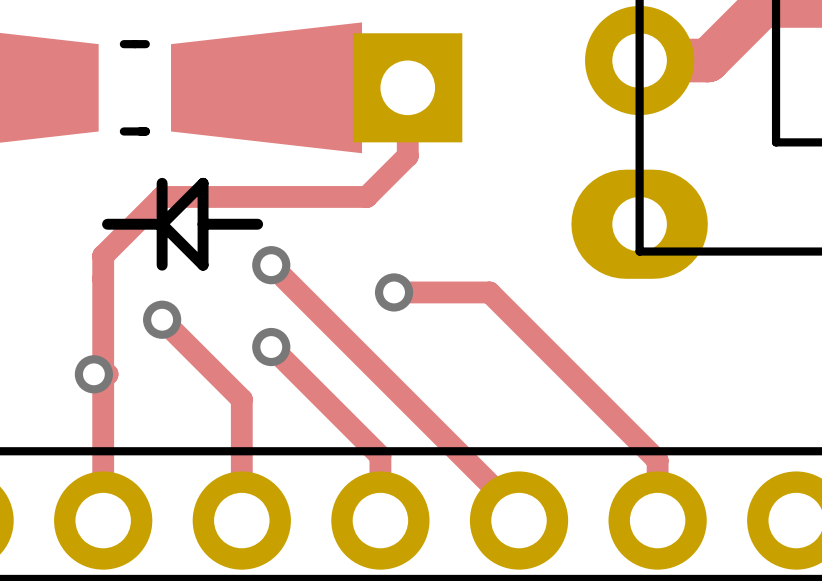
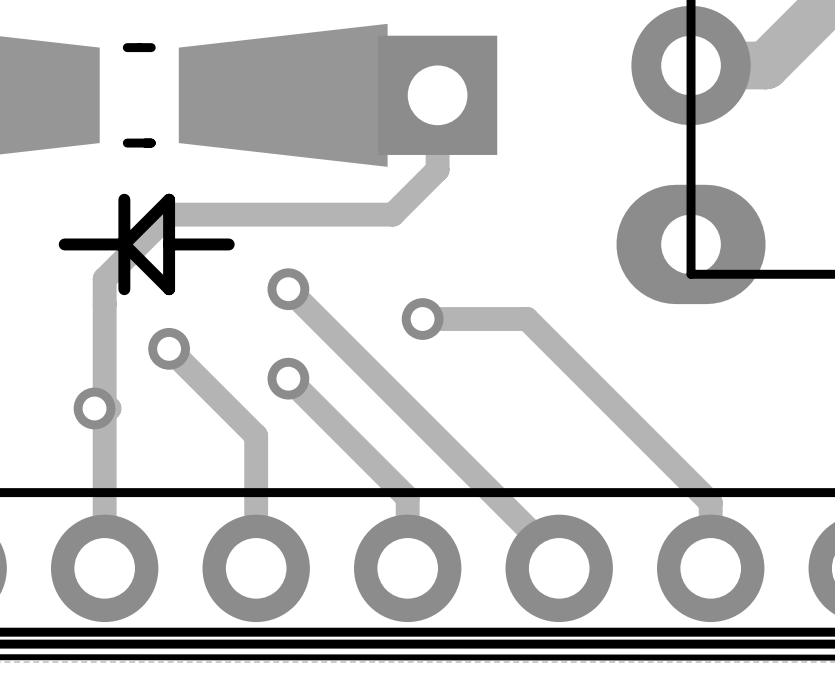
line: none -> (124, 199) (124, 289)
line: none -> (169, 199) (124, 244) (169, 289)
line: (121, 224) (162, 224) -> (64, 244) (109, 244)
line: (162, 224) (203, 183) (203, 265) (162, 224) -> (169, 244) (213, 244)
line: (216, 224) (257, 224) -> none

